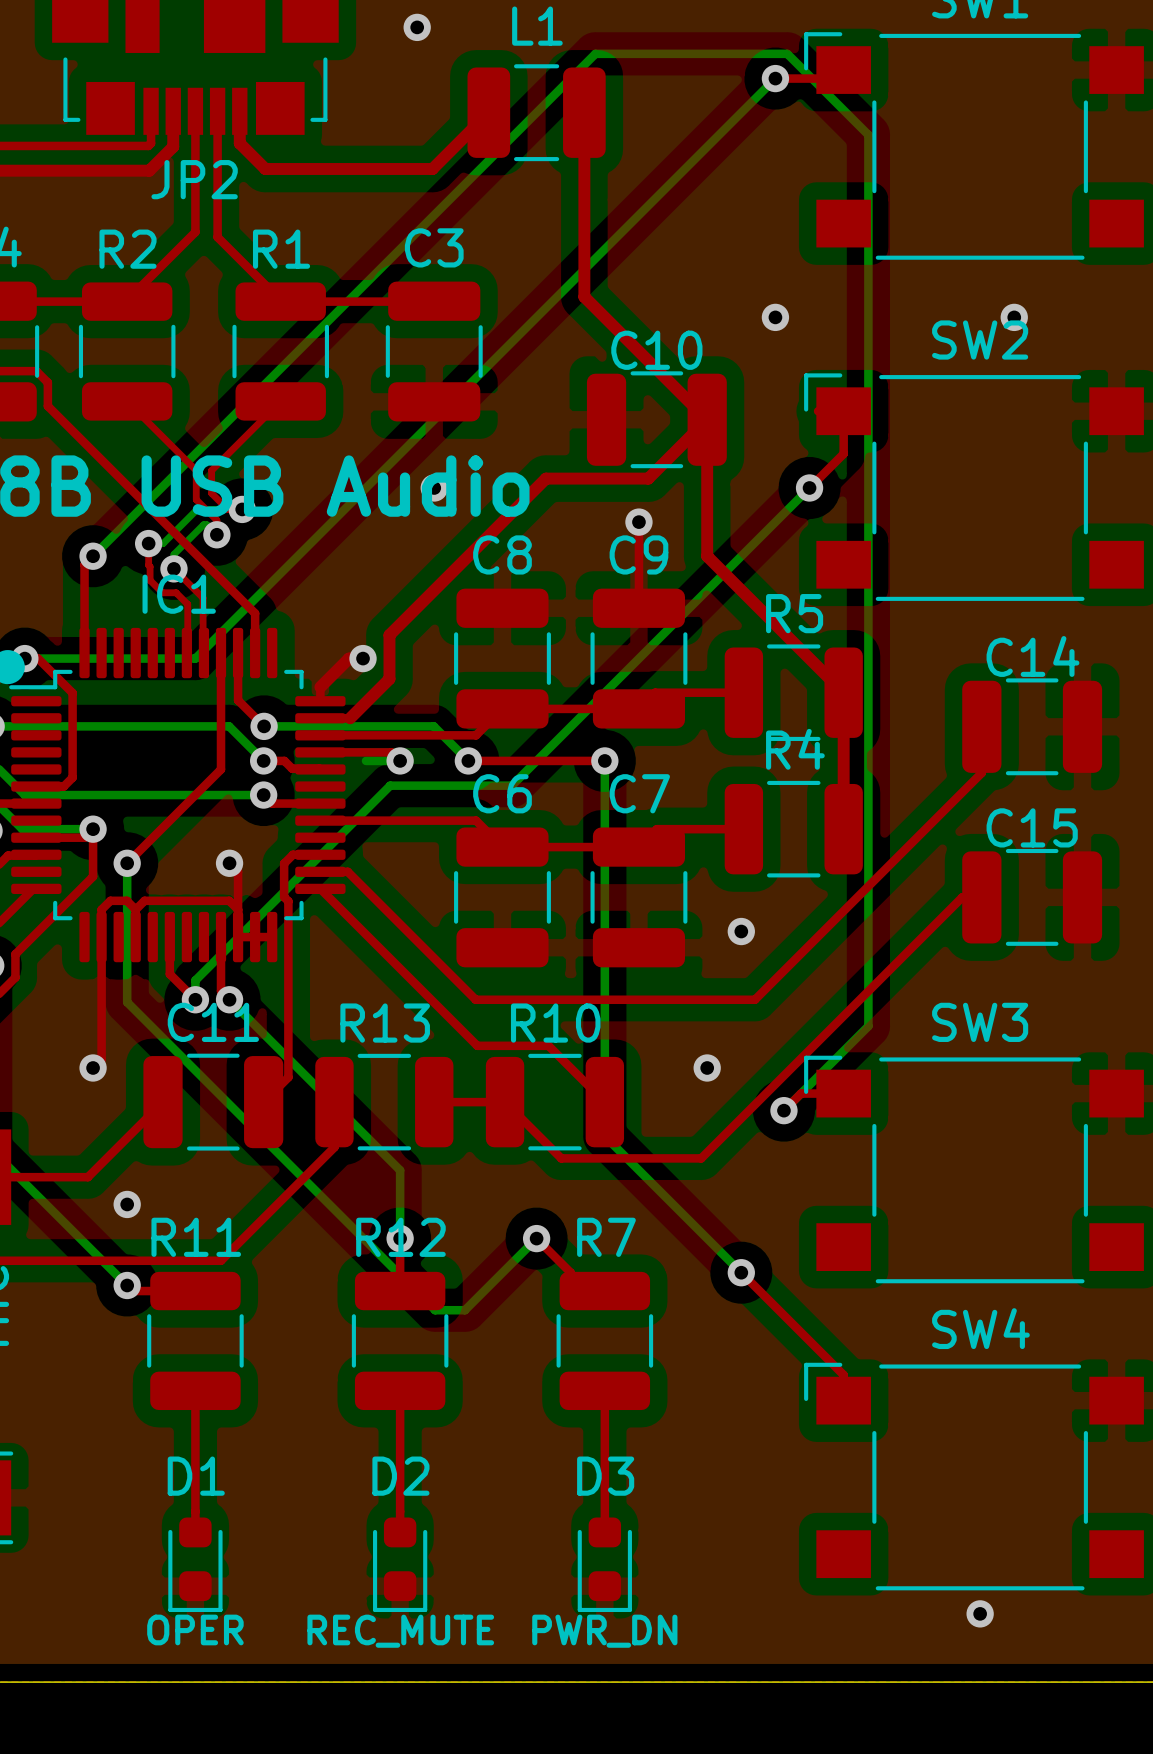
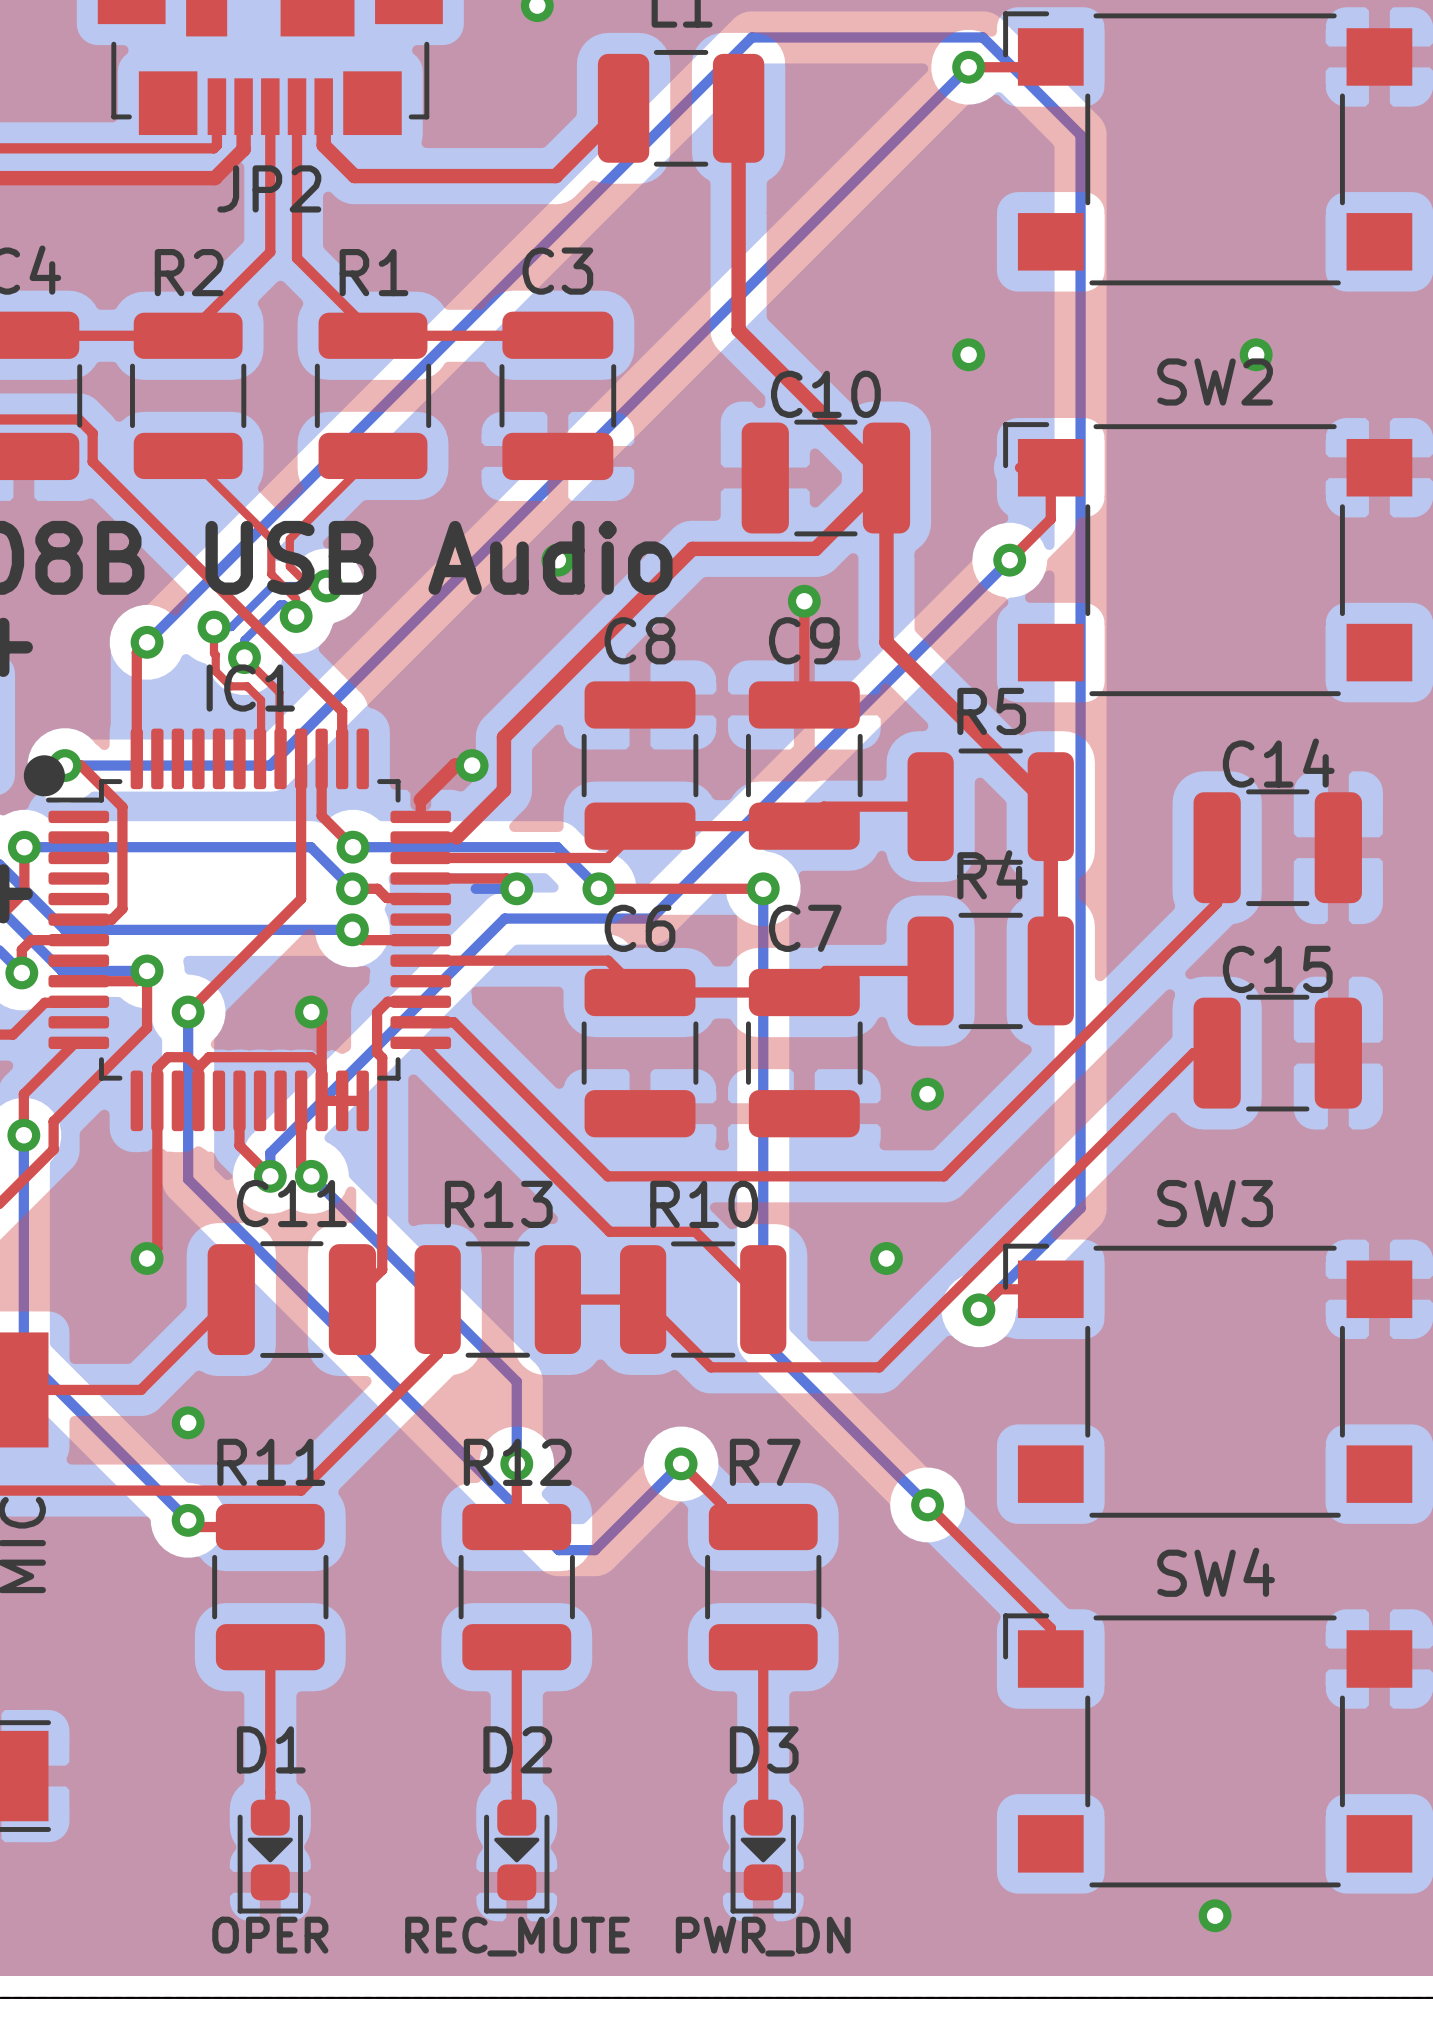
D1 footprint: [168, 1517, 223, 1613] -> [237, 1799, 303, 1914]
D2 footprint: [373, 1517, 428, 1613] -> [484, 1799, 550, 1914]
D3 footprint: [577, 1517, 632, 1613] -> [730, 1799, 796, 1914]

